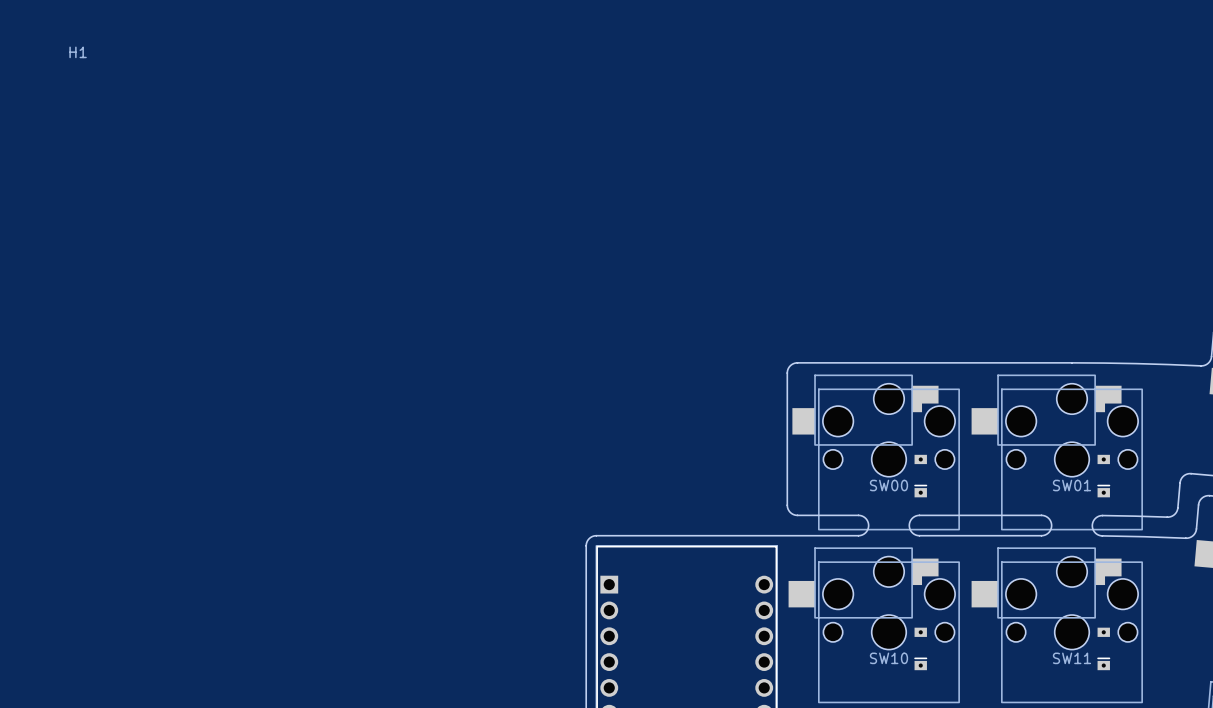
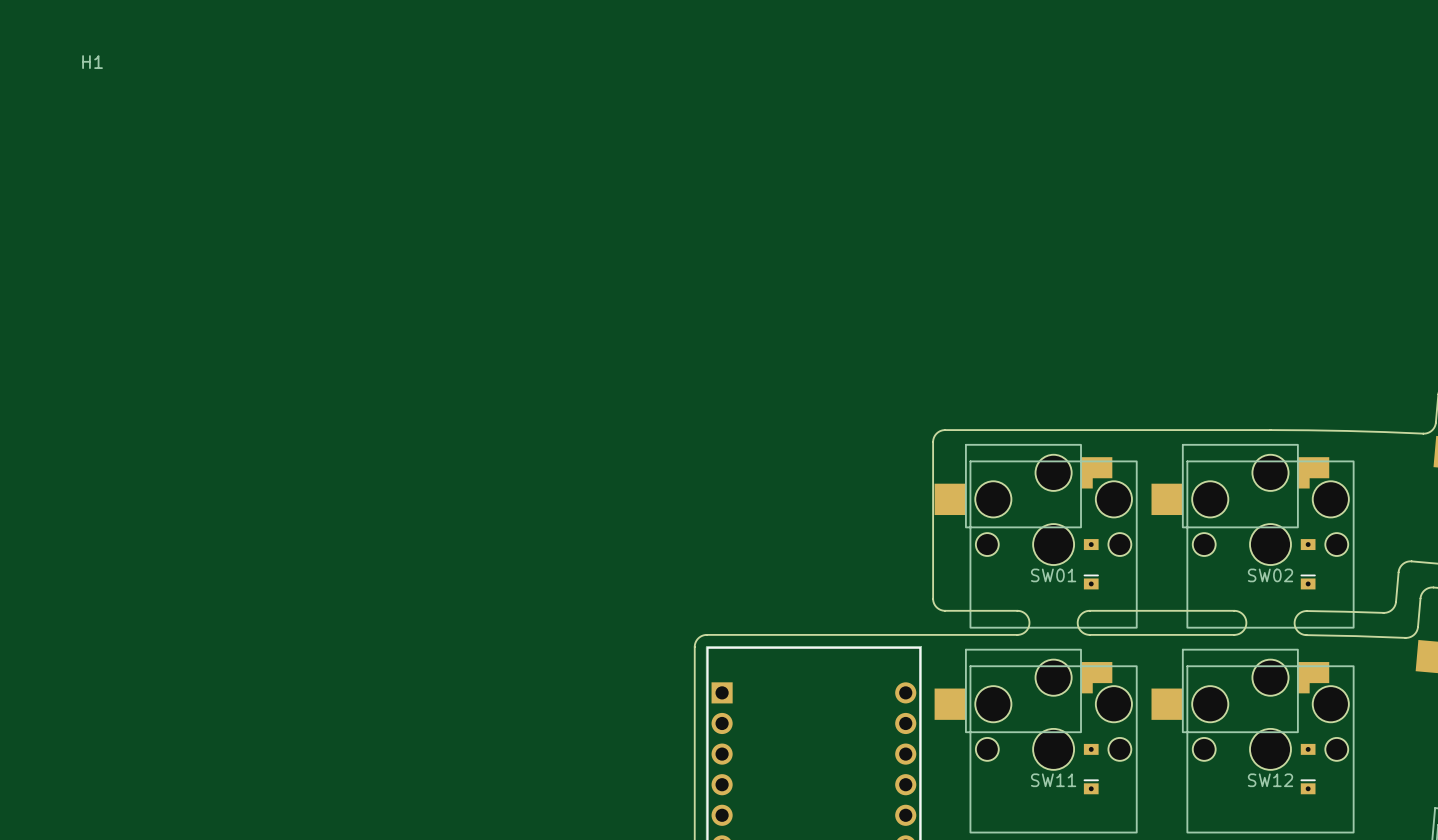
SW01: none -> (1035, 536)
SW00: (875, 452) -> none
SW01 name: SW01 (1071, 485) -> SW02 (1270, 575)
SW10 name: SW10 (888, 658) -> SW11 (1053, 780)
SW11 name: SW11 (1071, 658) -> SW12 (1270, 780)

